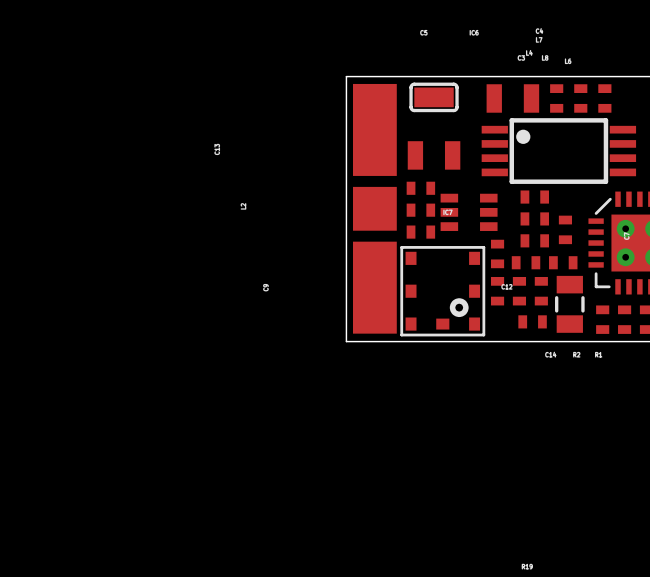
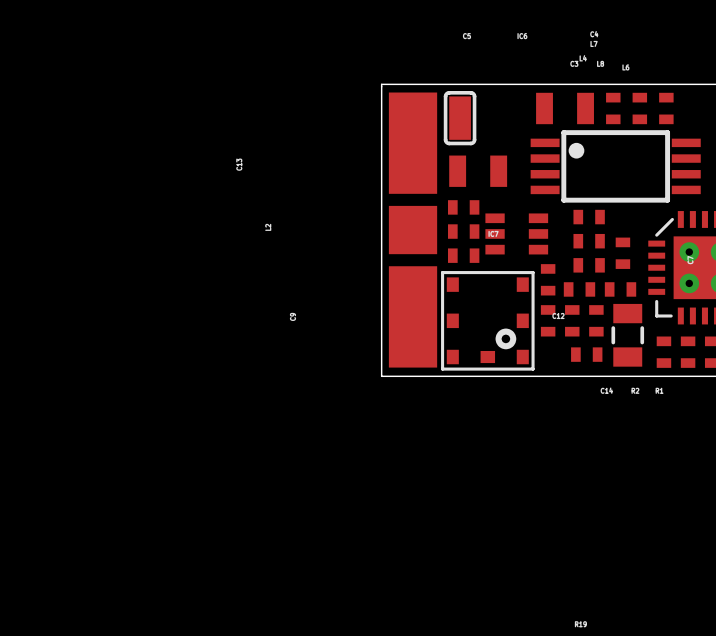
part rotation: 0° (434, 97) -> 90° clockwise (460, 118)

